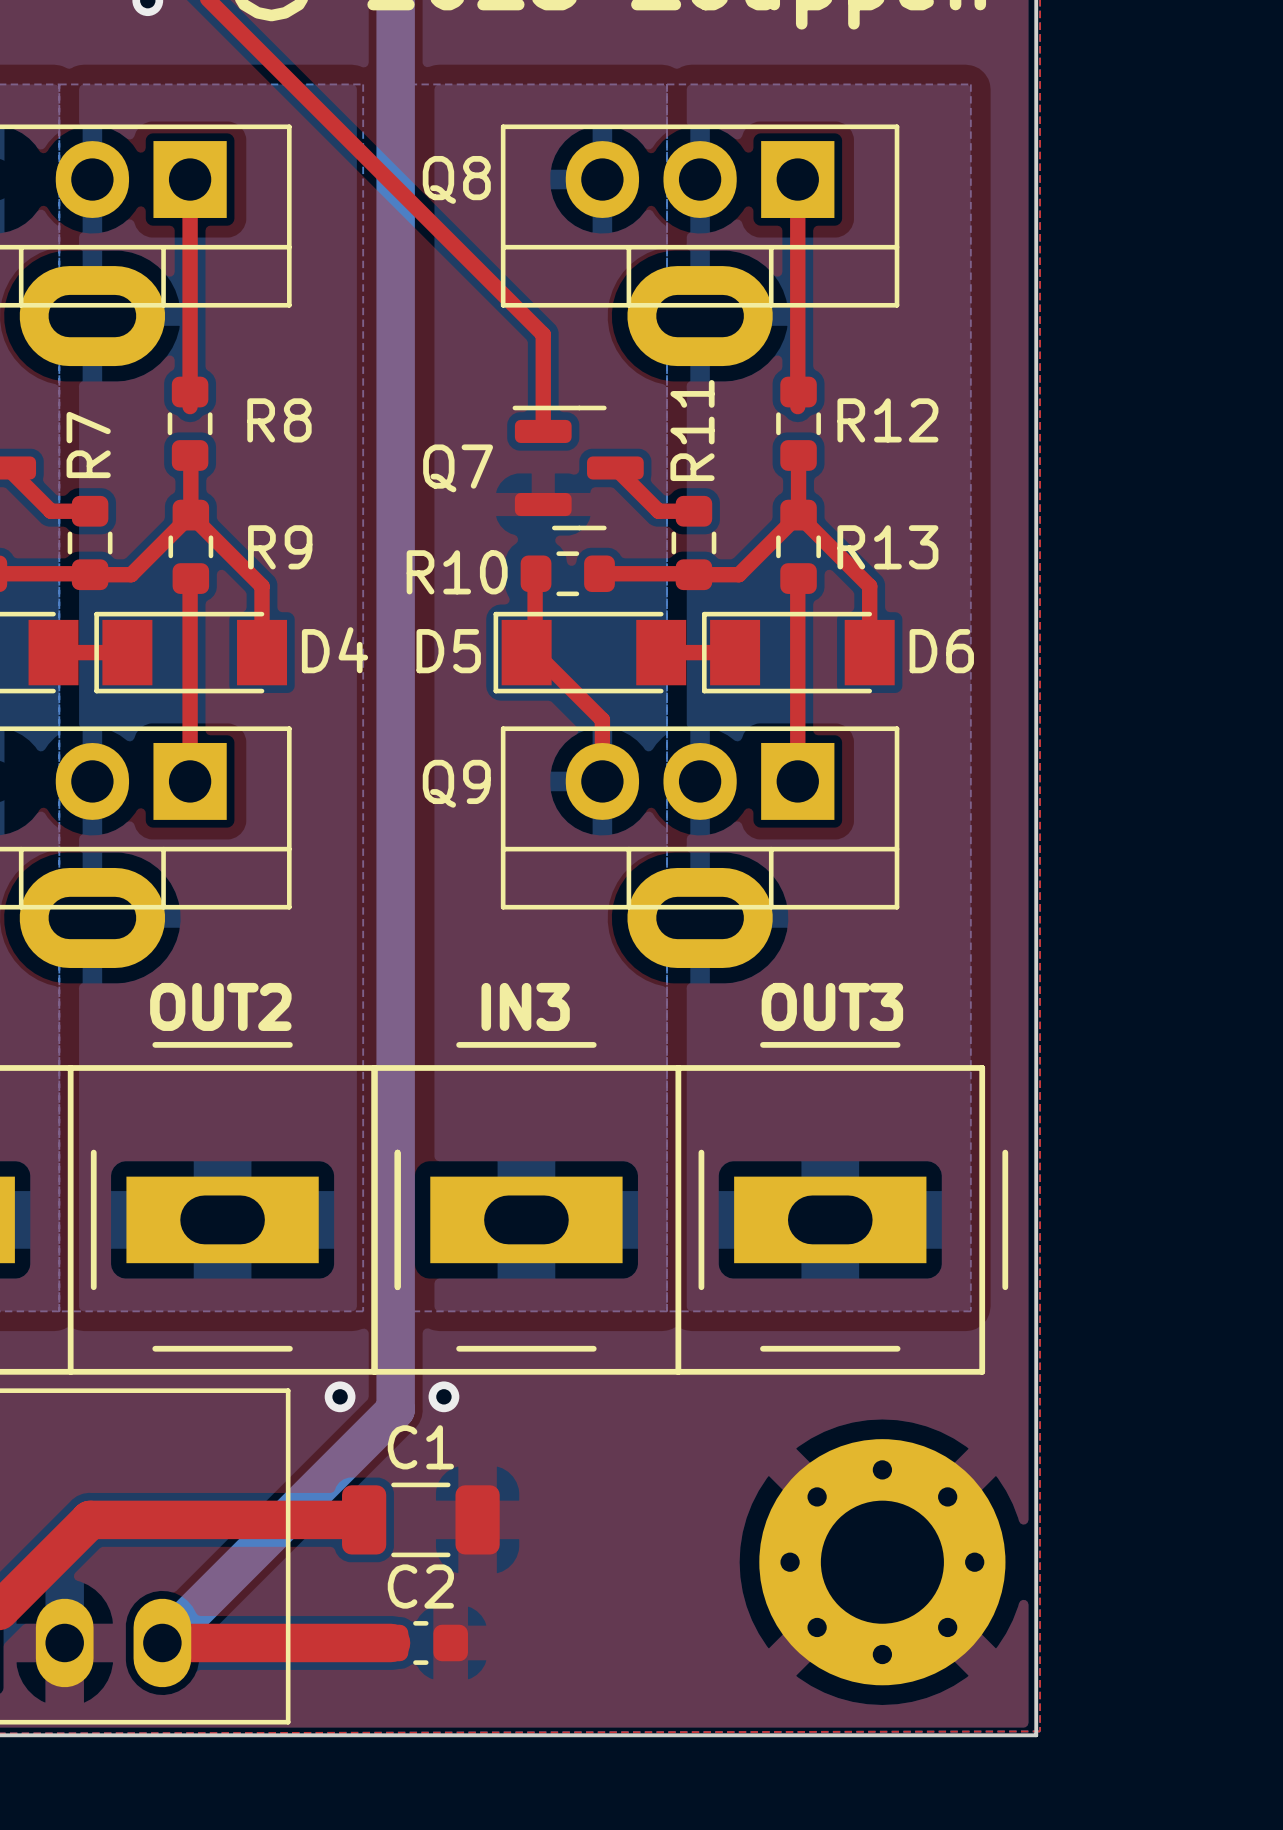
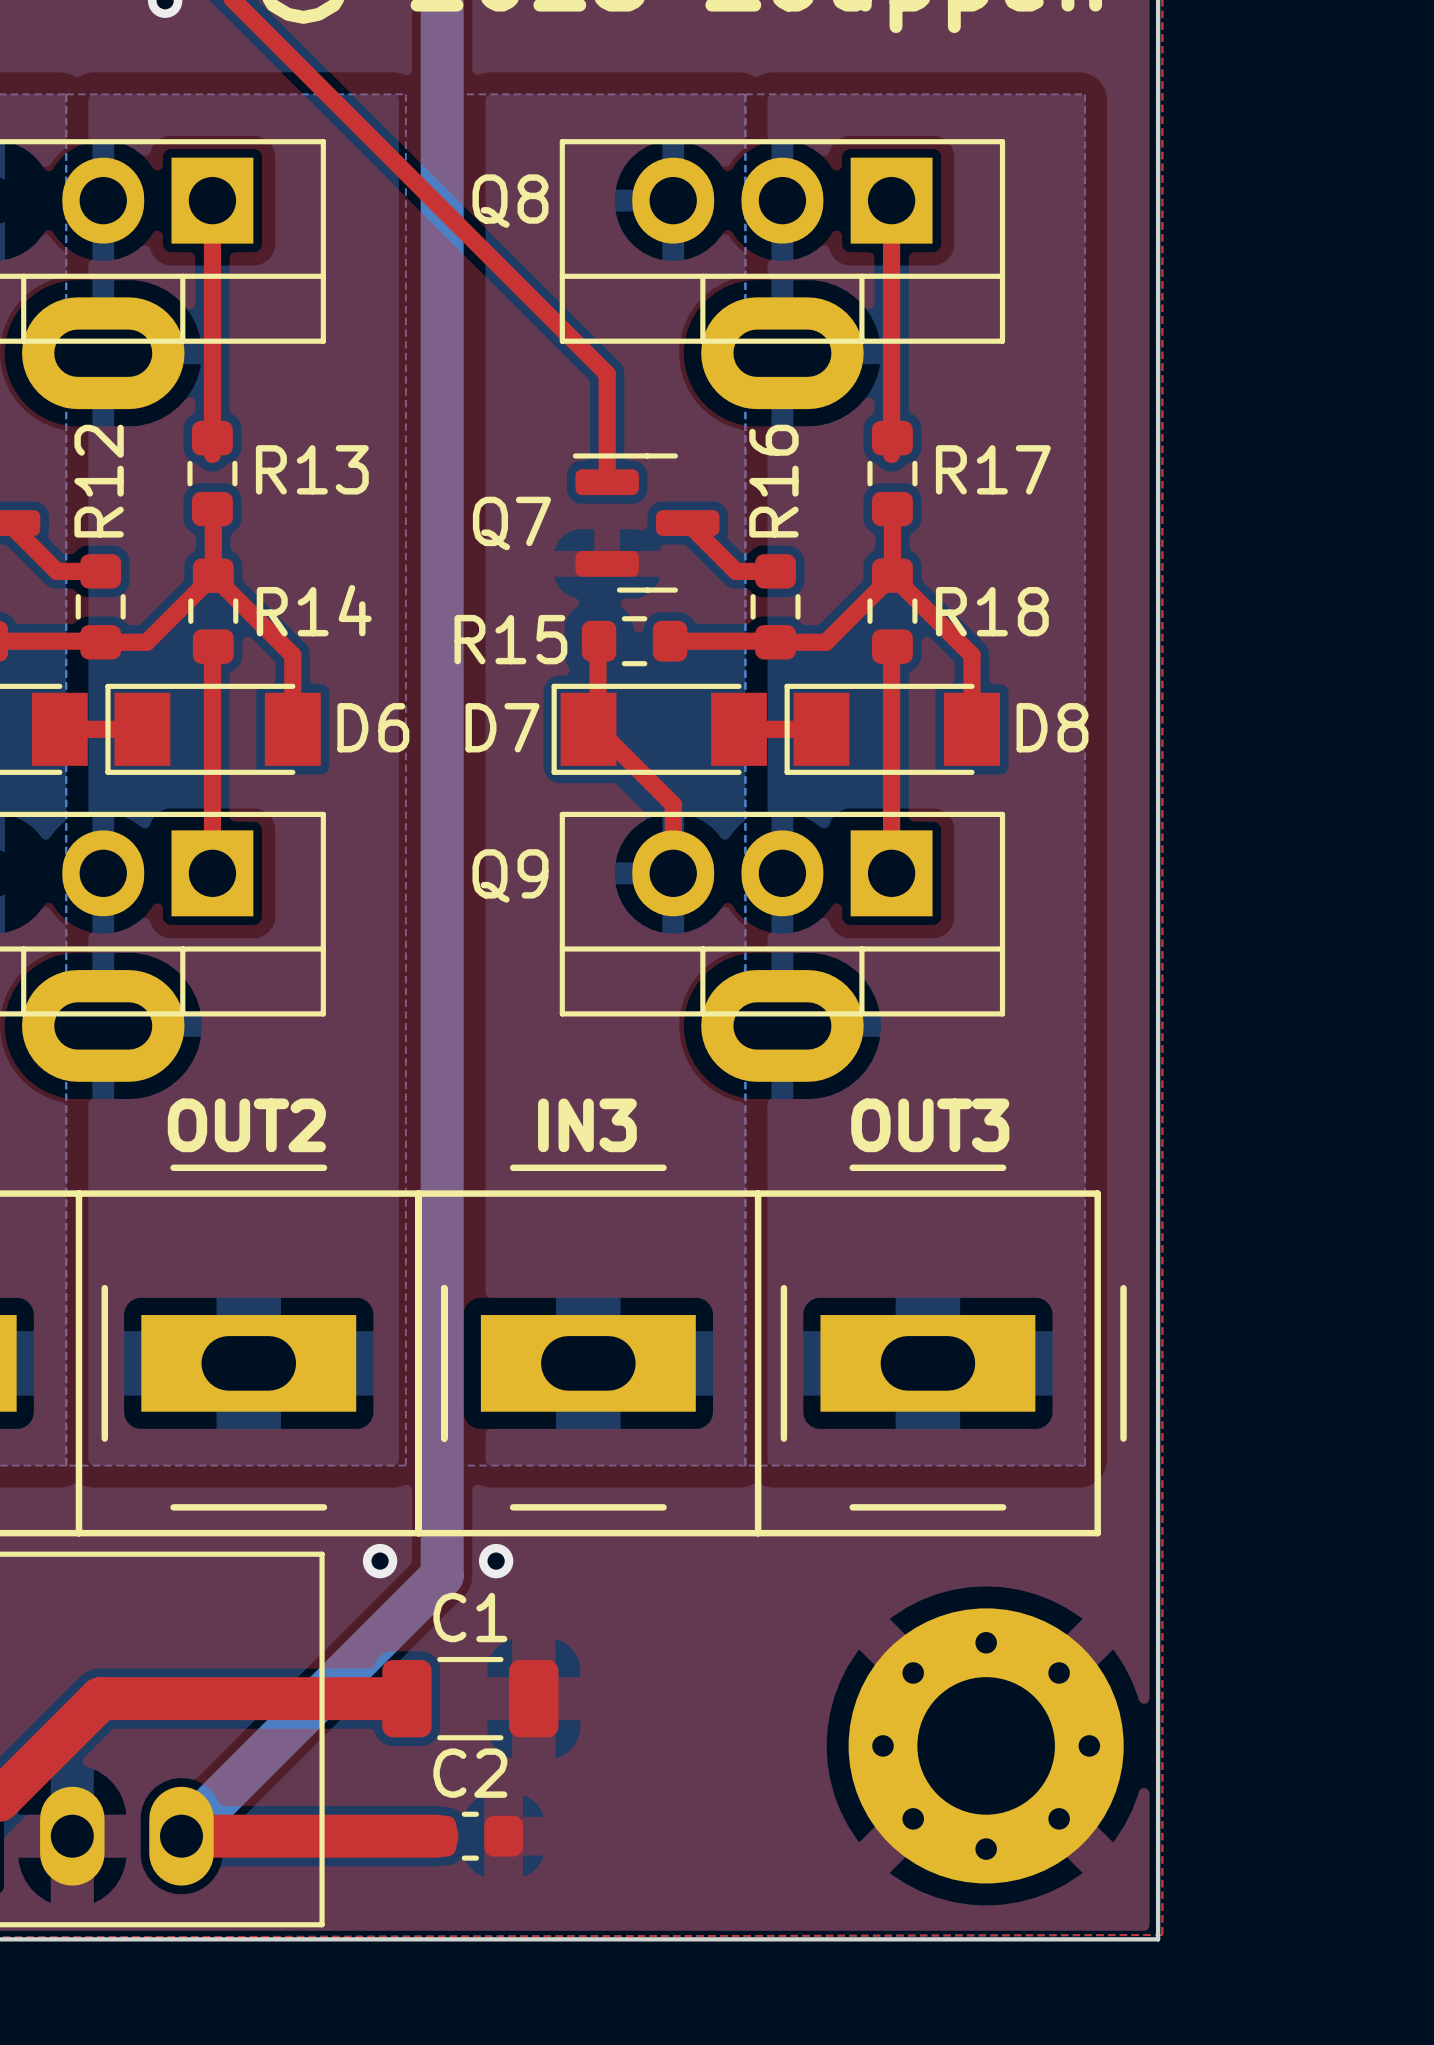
R8 name: R8 (279, 420) -> R13 (312, 469)
R12 name: R12 (887, 420) -> R17 (993, 469)
R11 name: R11 (692, 430) -> R16 (773, 481)
R7 name: R7 (88, 445) -> R12 (99, 481)
R9 name: R9 (280, 547) -> R14 (314, 610)
R13 name: R13 (887, 547) -> R18 (992, 611)
R10 name: R10 (457, 572) -> R15 (510, 639)
D4 name: D4 (335, 650) -> D6 (373, 727)
D5 name: D5 (448, 651) -> D7 (502, 727)
D6 name: D6 (941, 651) -> D8 (1052, 727)

